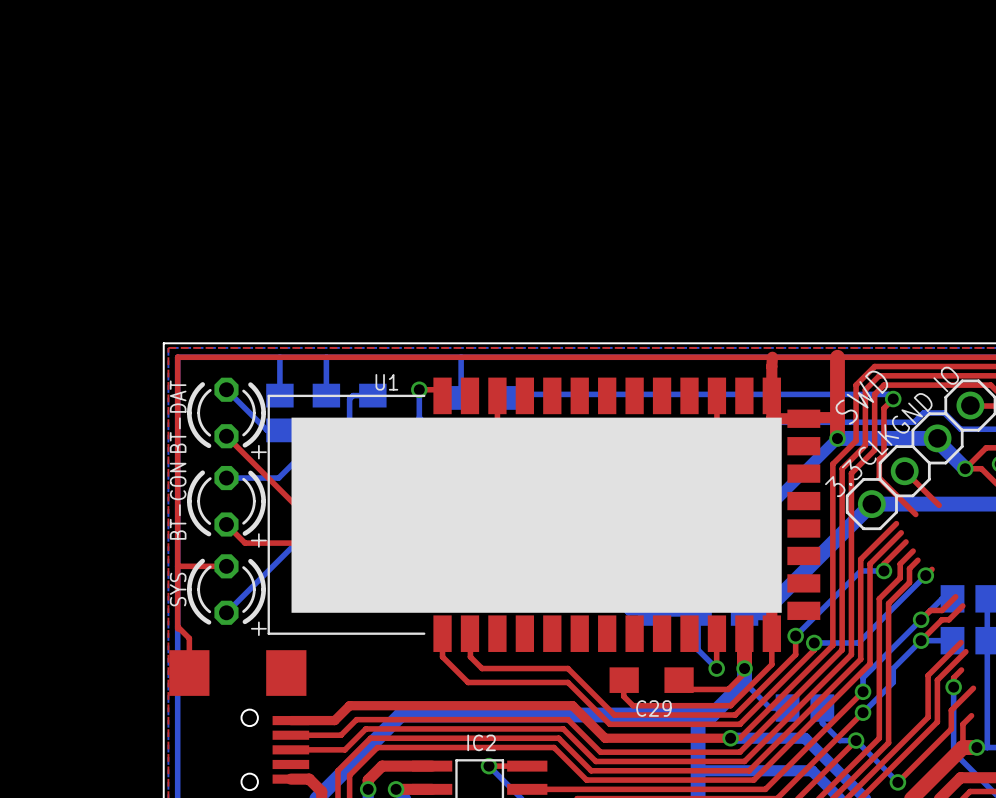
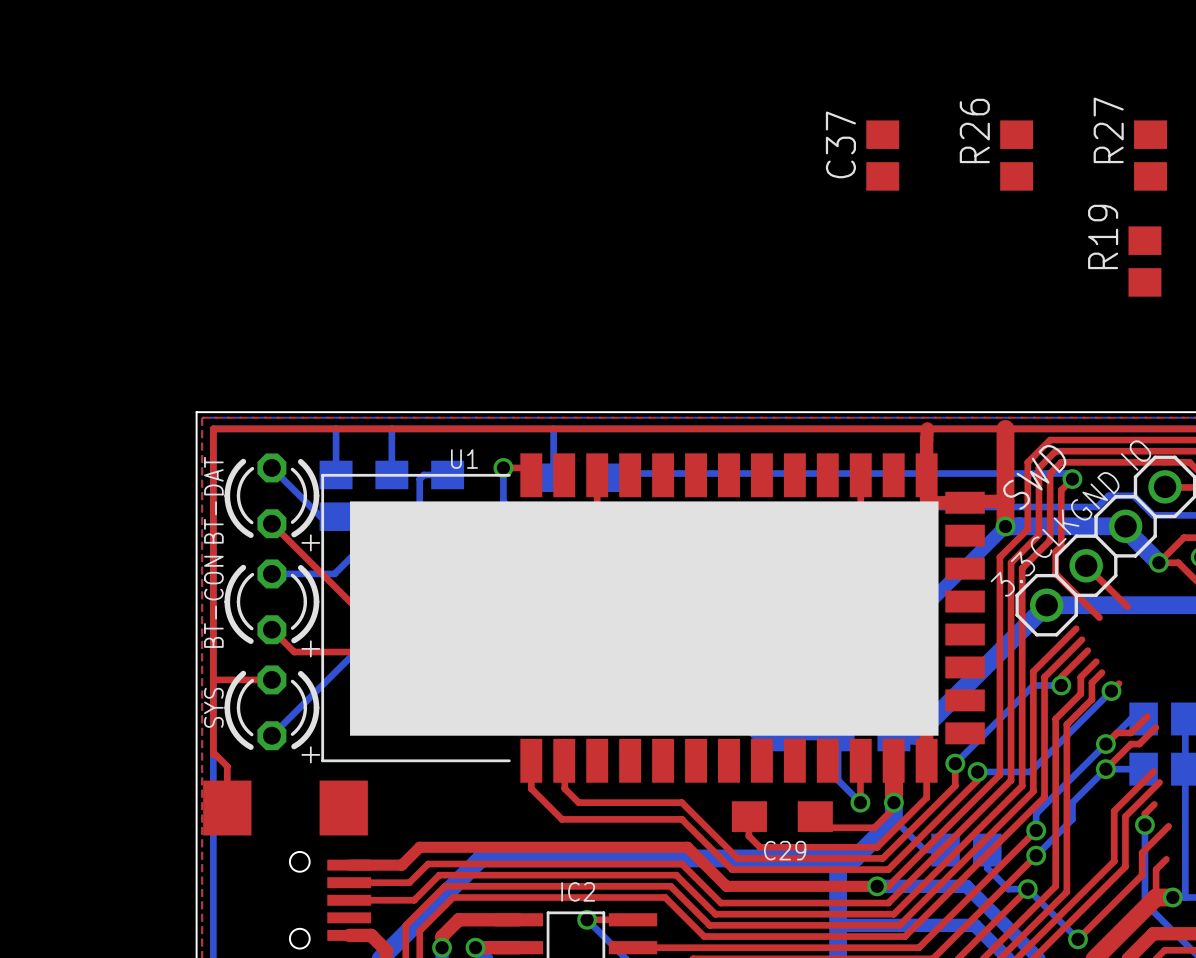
C37: none -> (882, 155)
R26: none -> (1016, 155)
R27: none -> (1150, 155)
R19: none -> (1144, 261)

